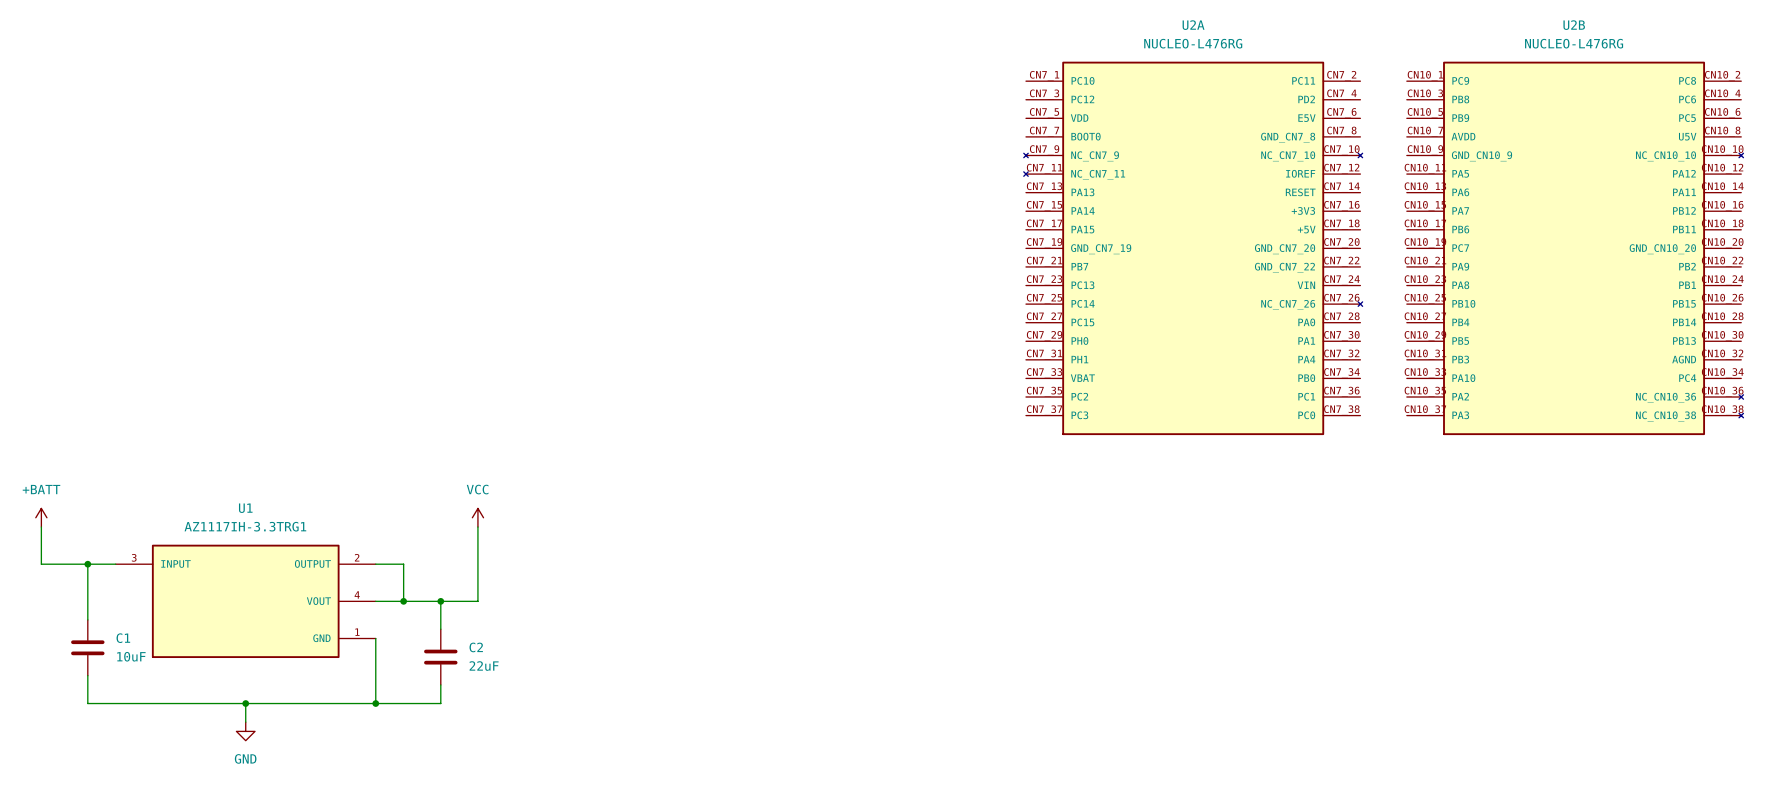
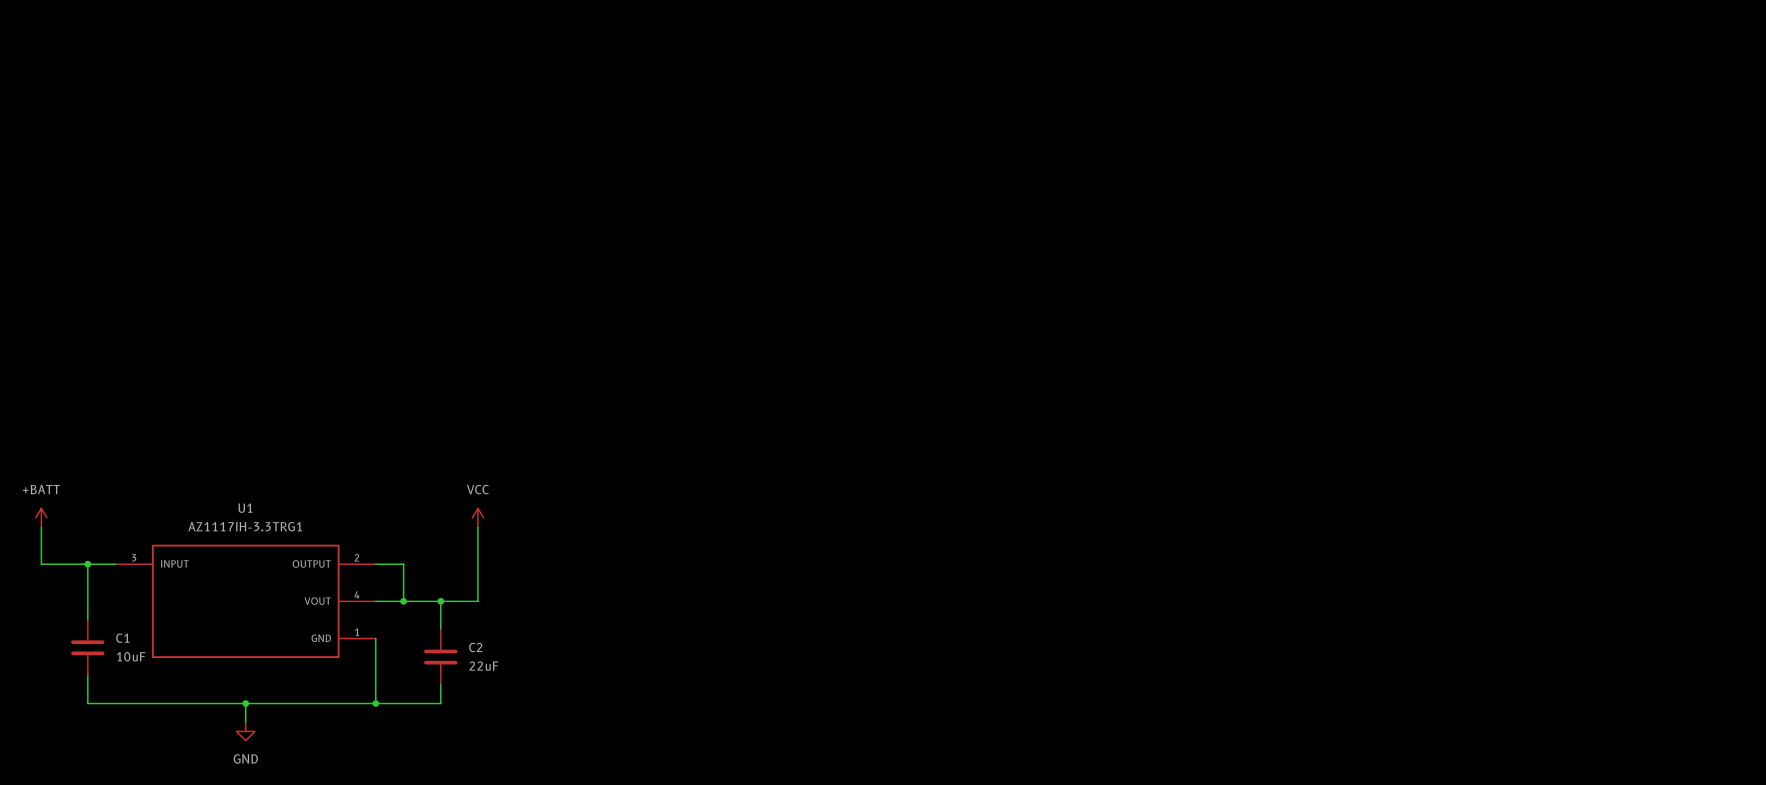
U2A: NUCLEO-L476RG (1193, 248) -> none
U2B: NUCLEO-L476RG (1575, 248) -> none

